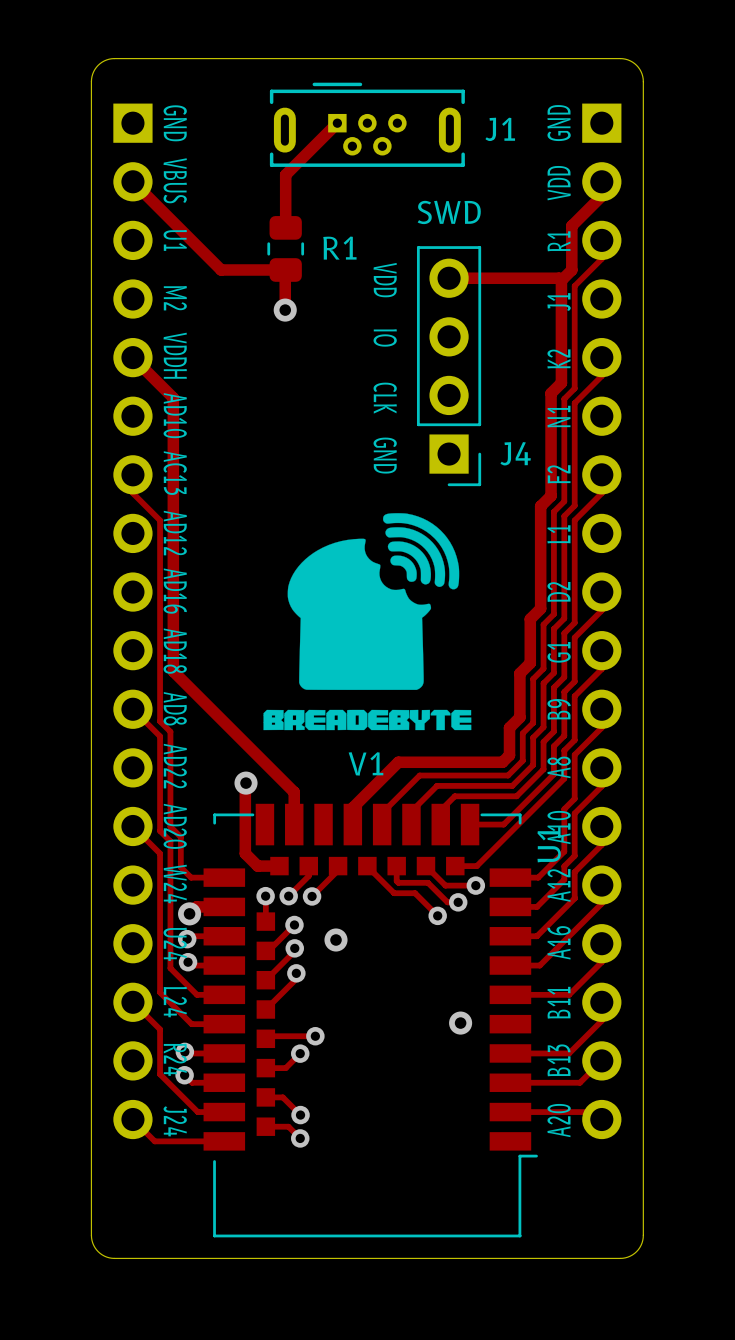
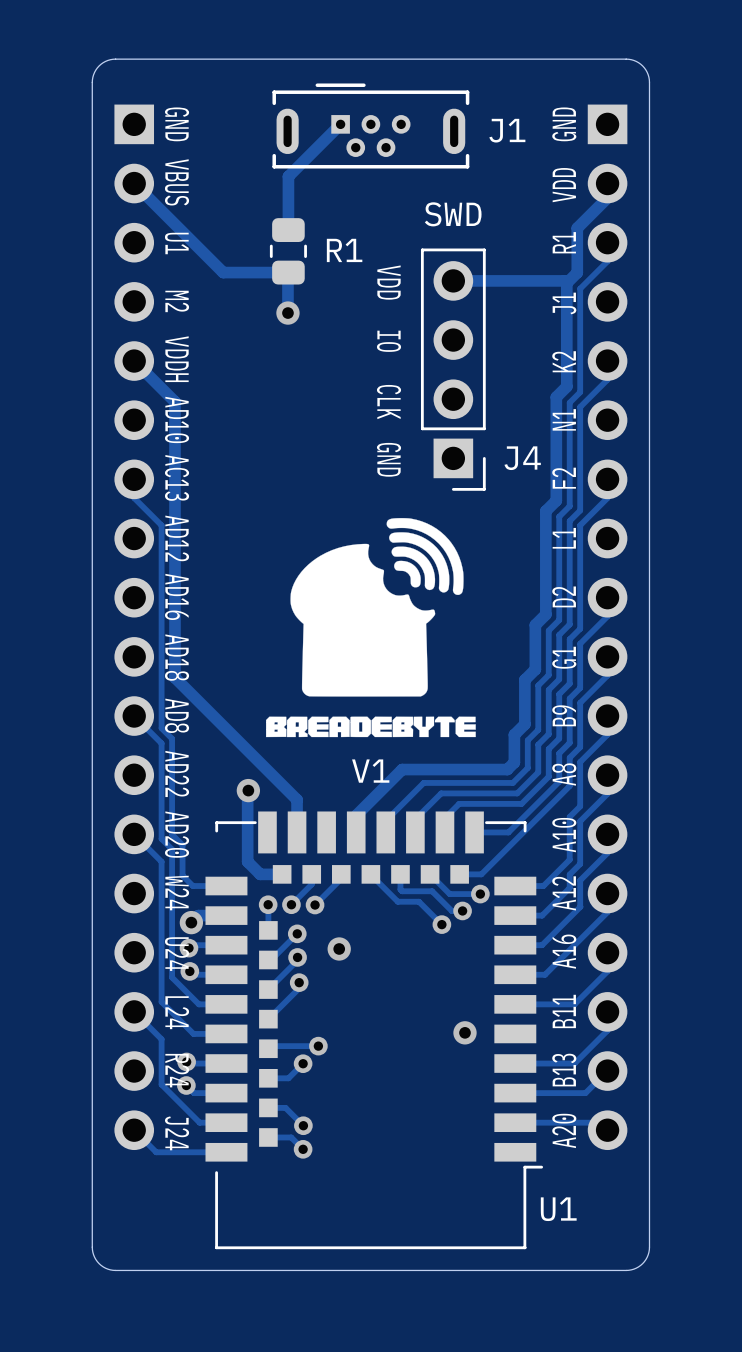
U1 name rotation: 0° (549, 844) -> 90° clockwise (558, 1209)
U1 name position: U1 (549, 844) -> U1 (558, 1209)

